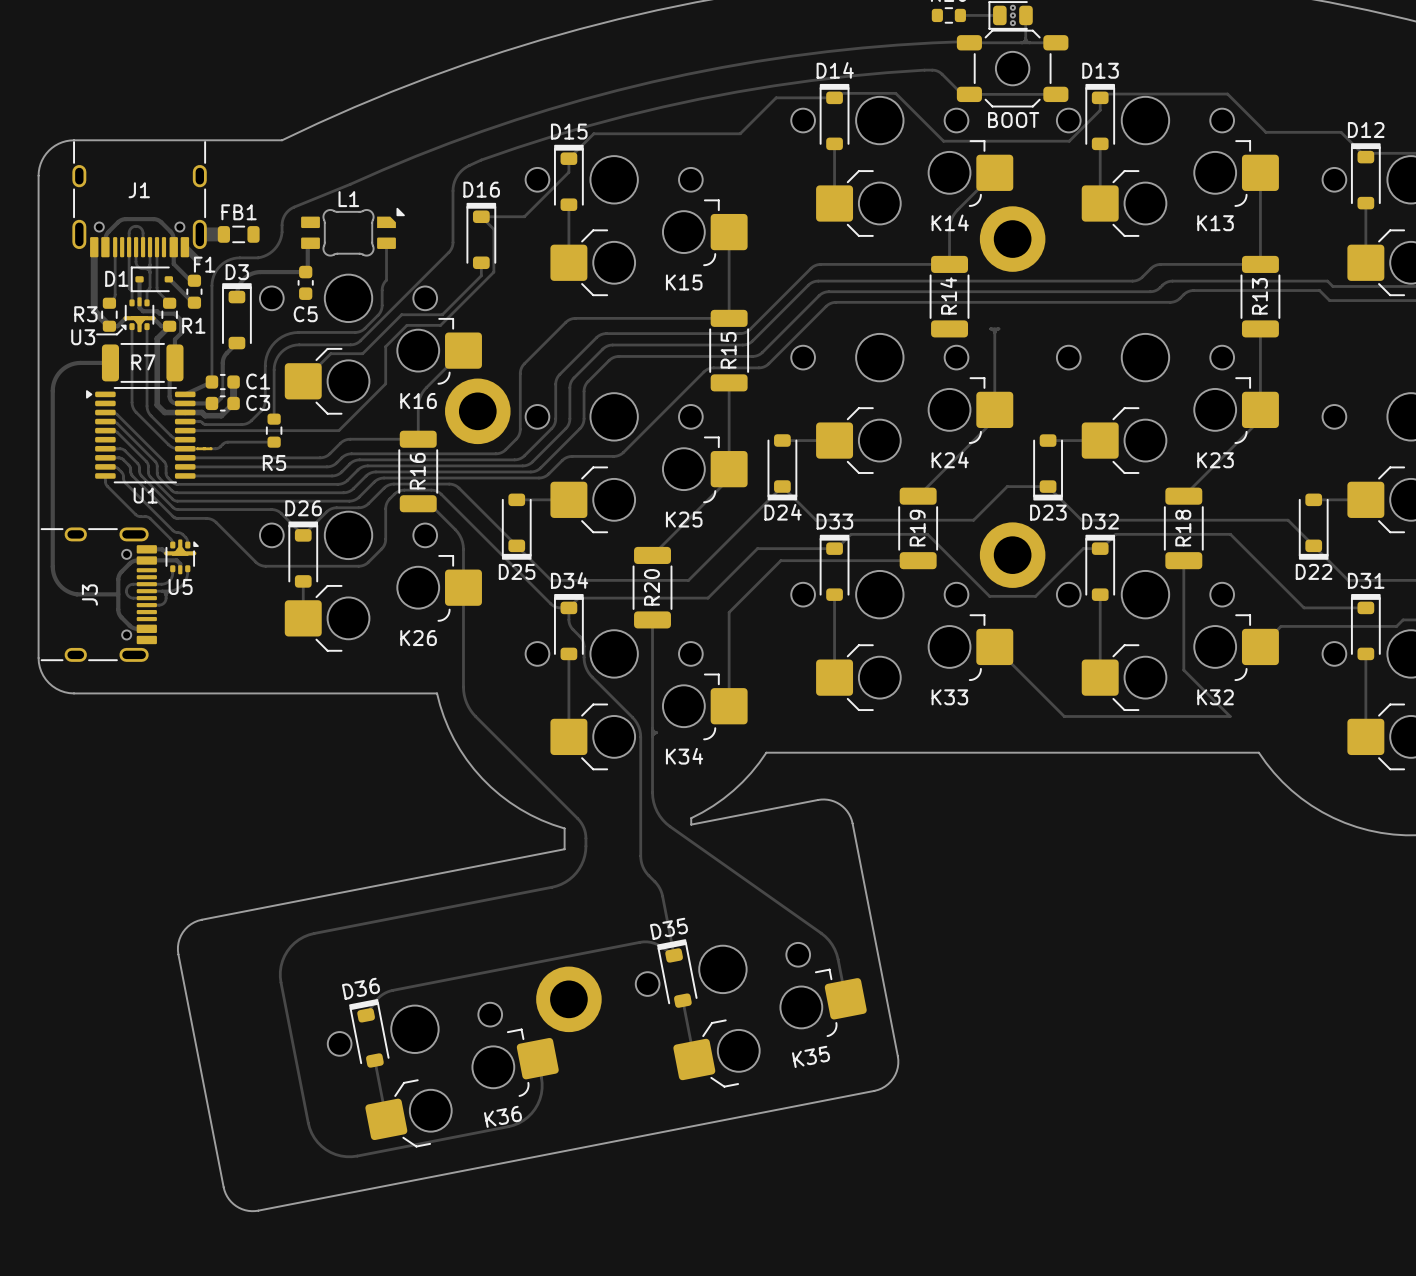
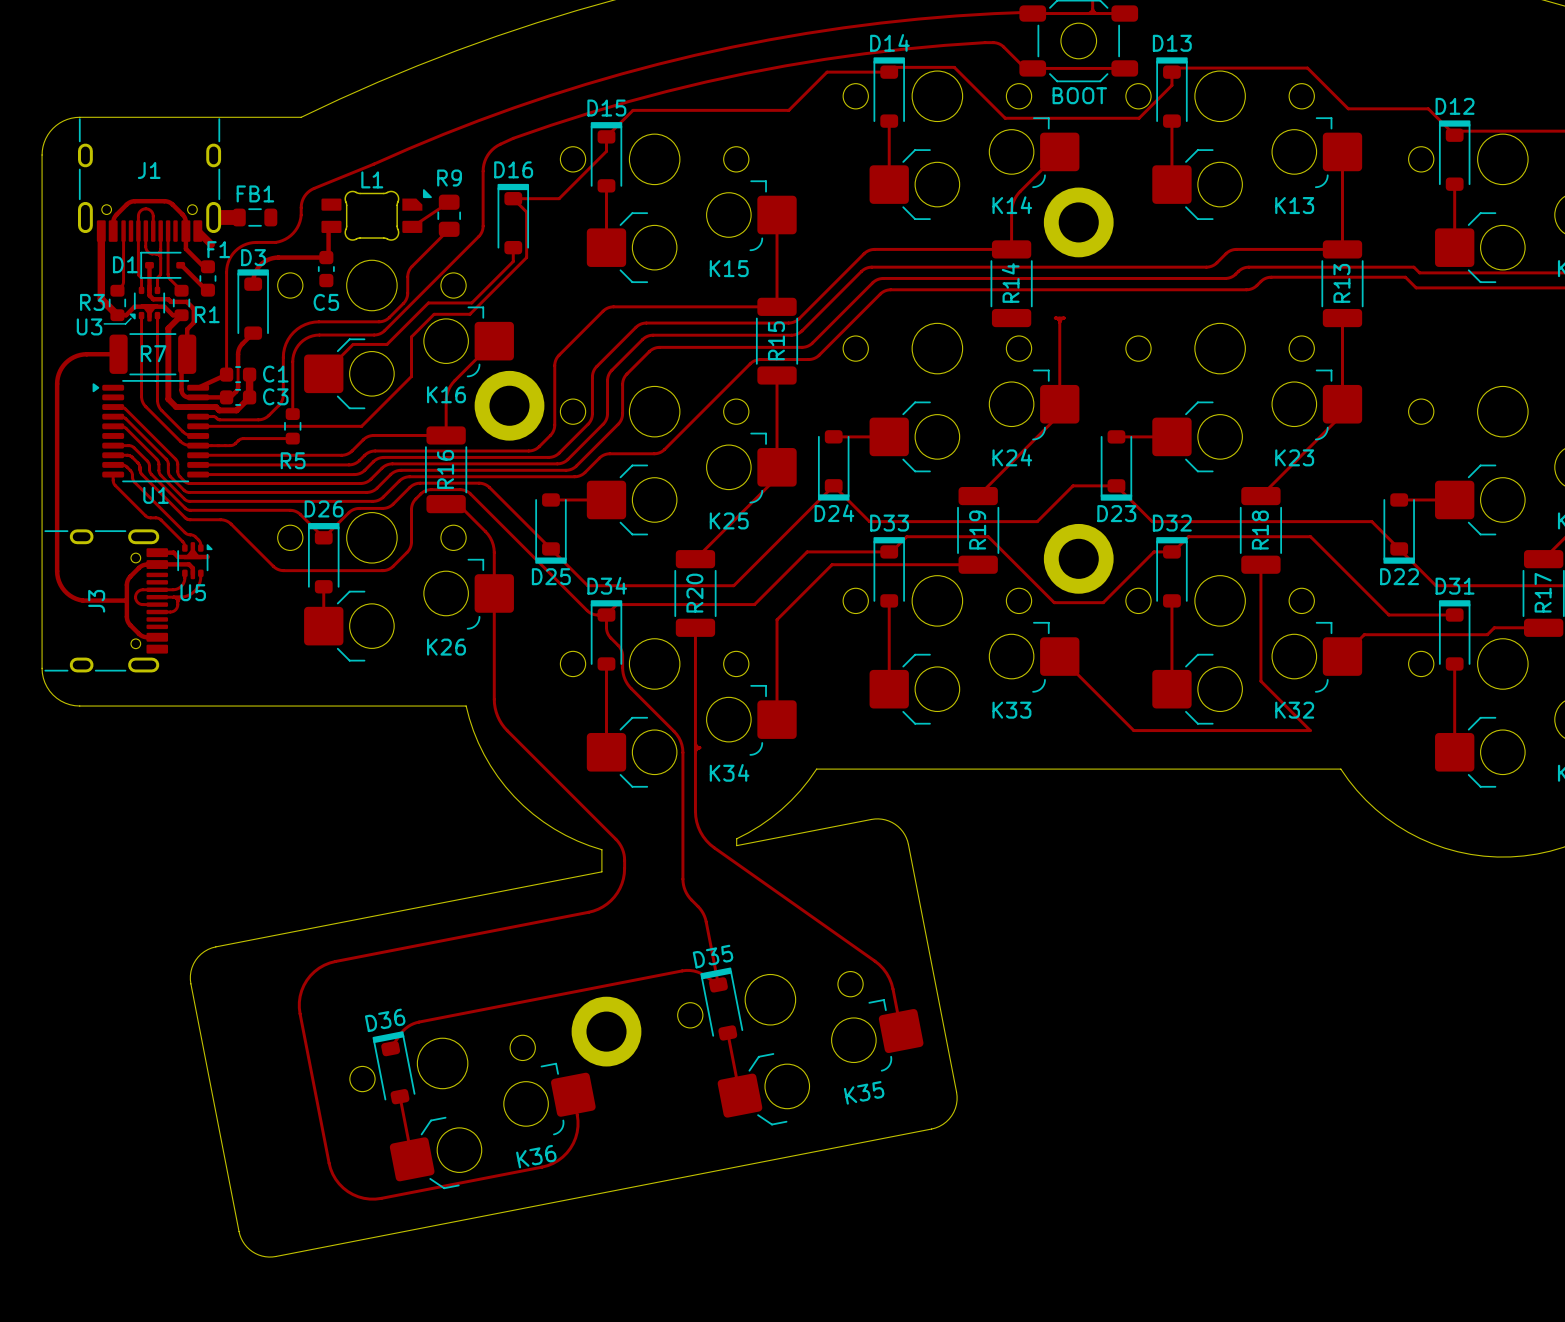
track: none -> (449, 202) (412, 226)
R9: none -> (449, 215)
track: (386, 243) (386, 280) -> (449, 229) (412, 266)

